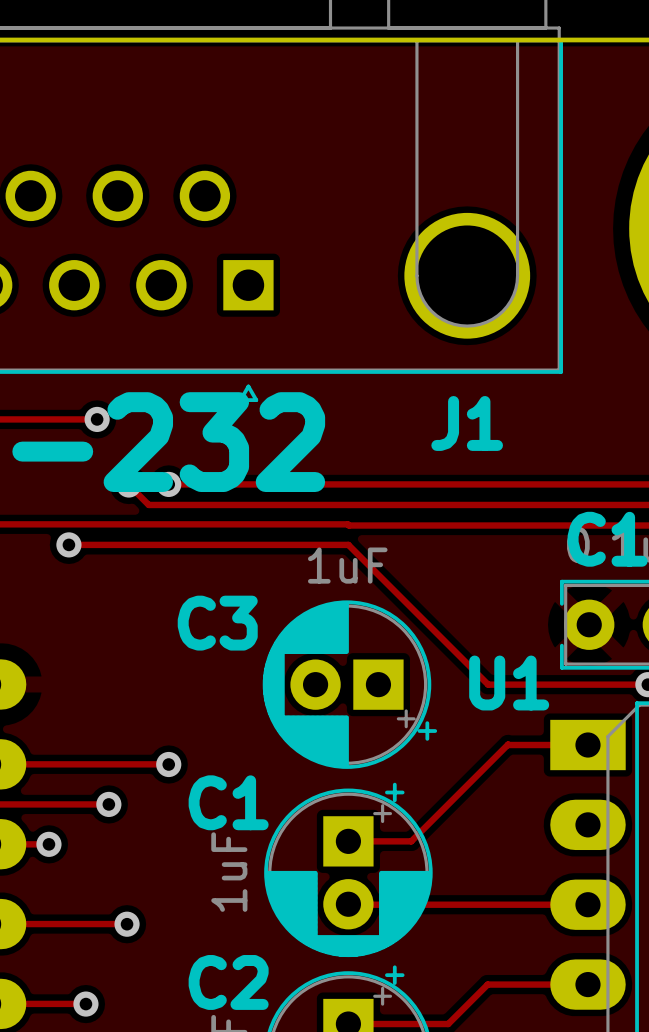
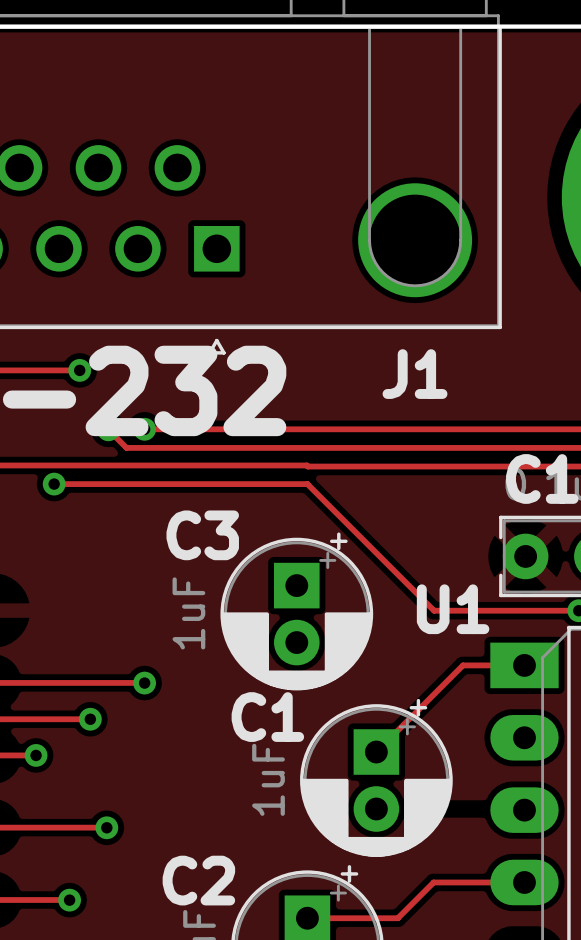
C3 rotation: 0° (349, 684) -> 90° counterclockwise (296, 611)
track: (520, 745) (508, 744) (411, 841) (348, 841) -> (462, 665) (376, 752)
C1 position: (348, 869) -> (376, 777)
track: (348, 904) (587, 904) -> none

